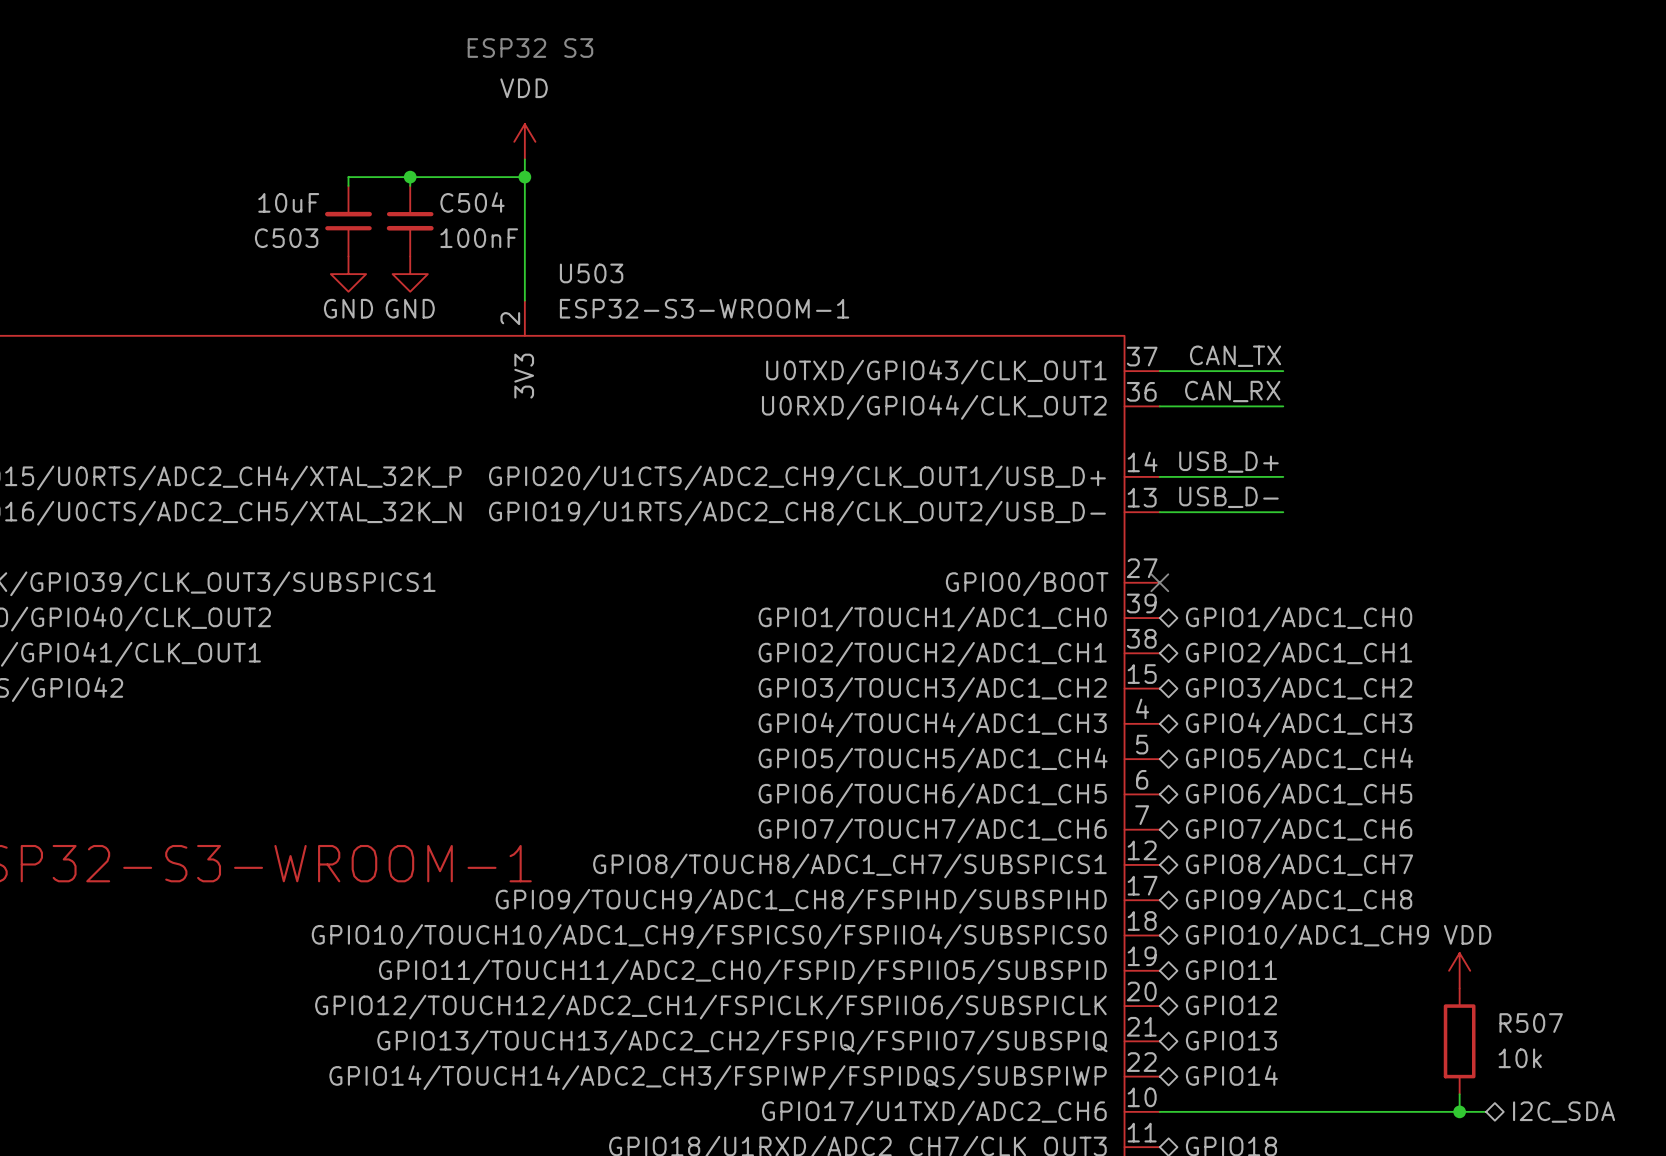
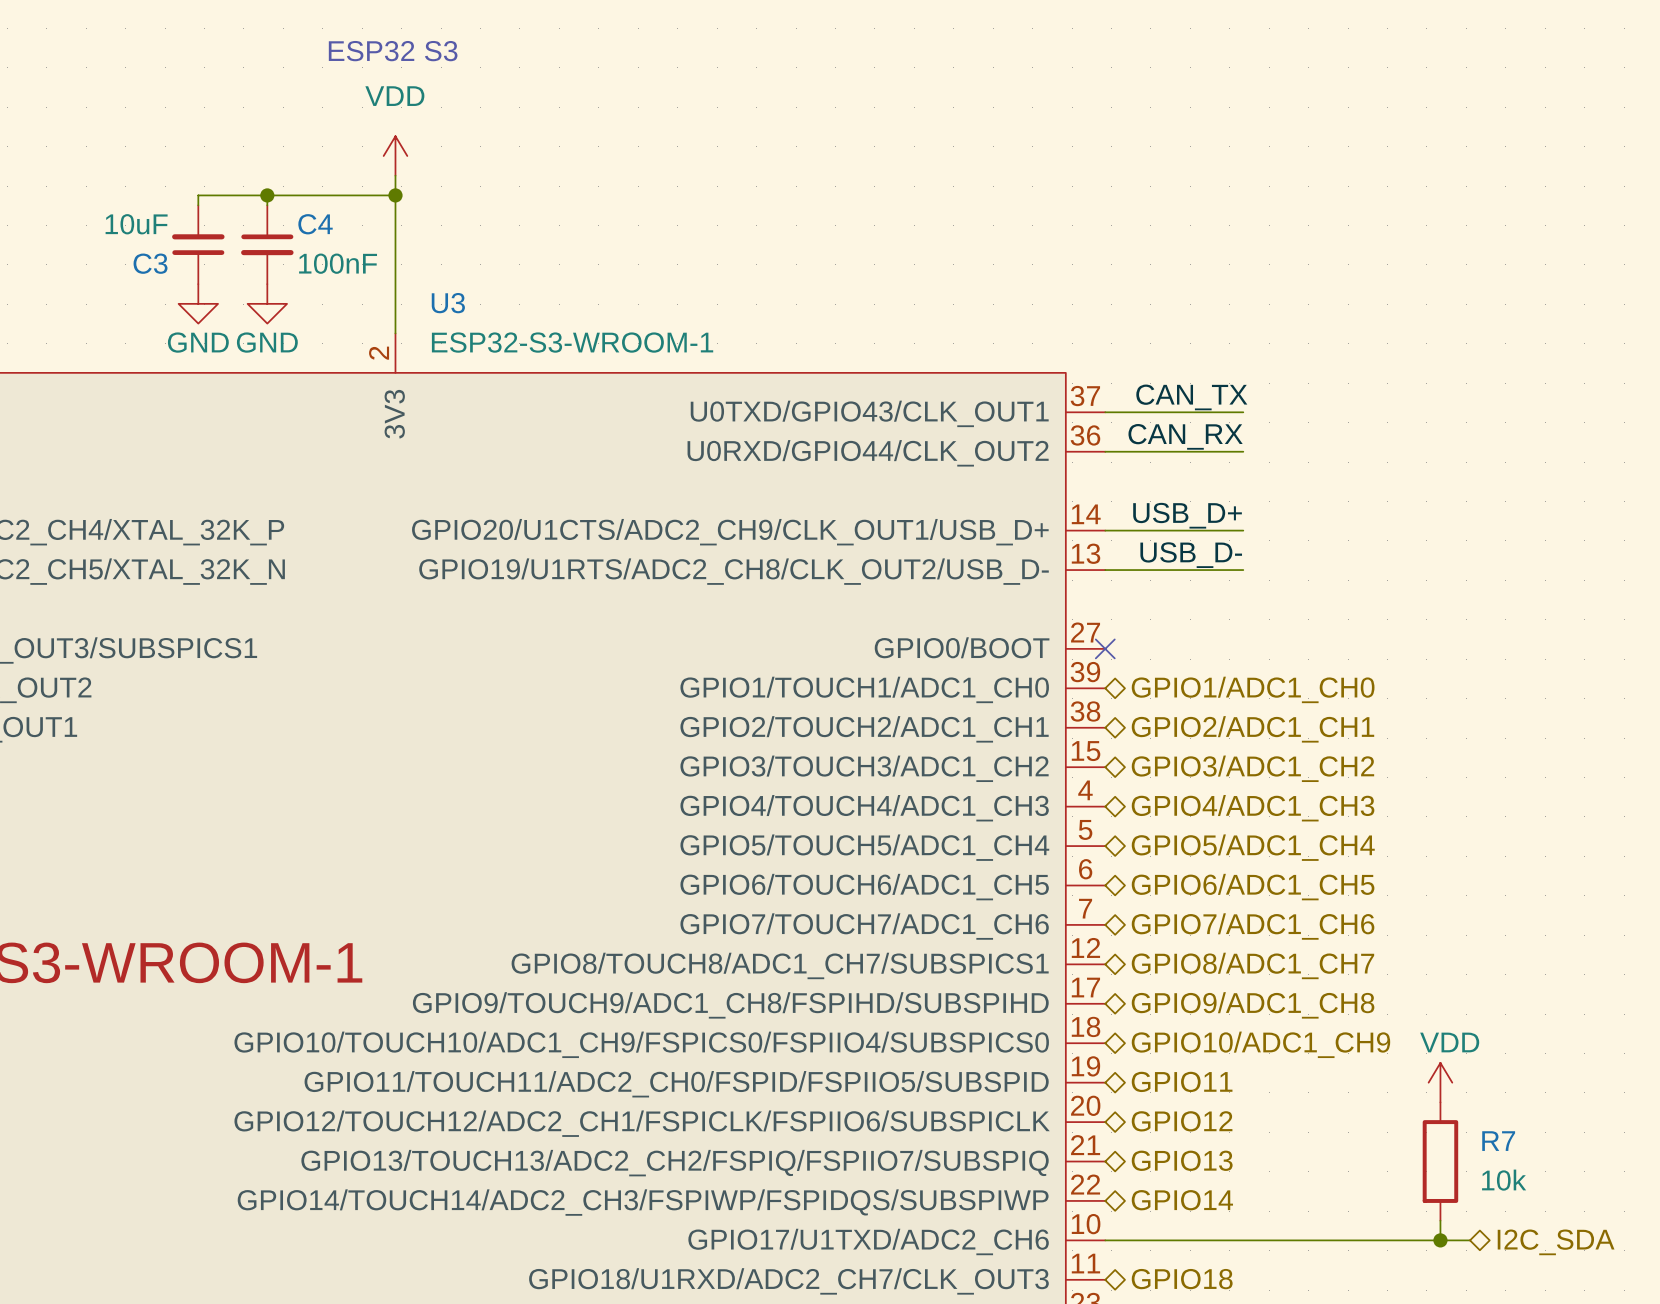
C504 name: C504 (472, 202) -> C4 (315, 224)
C503 name: C503 (286, 238) -> C3 (150, 263)
U503 name: U503 (591, 273) -> U3 (448, 303)
R507 name: R507 (1531, 1023) -> R7 (1498, 1141)

